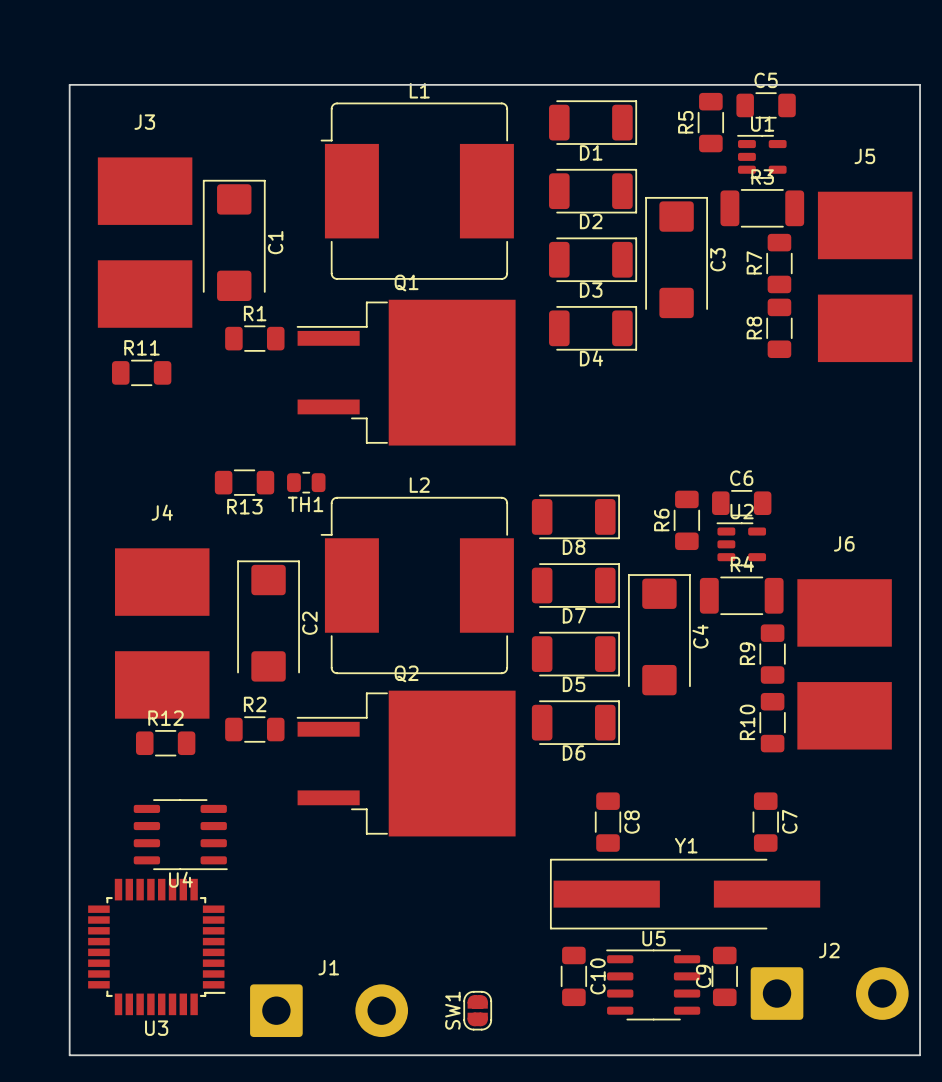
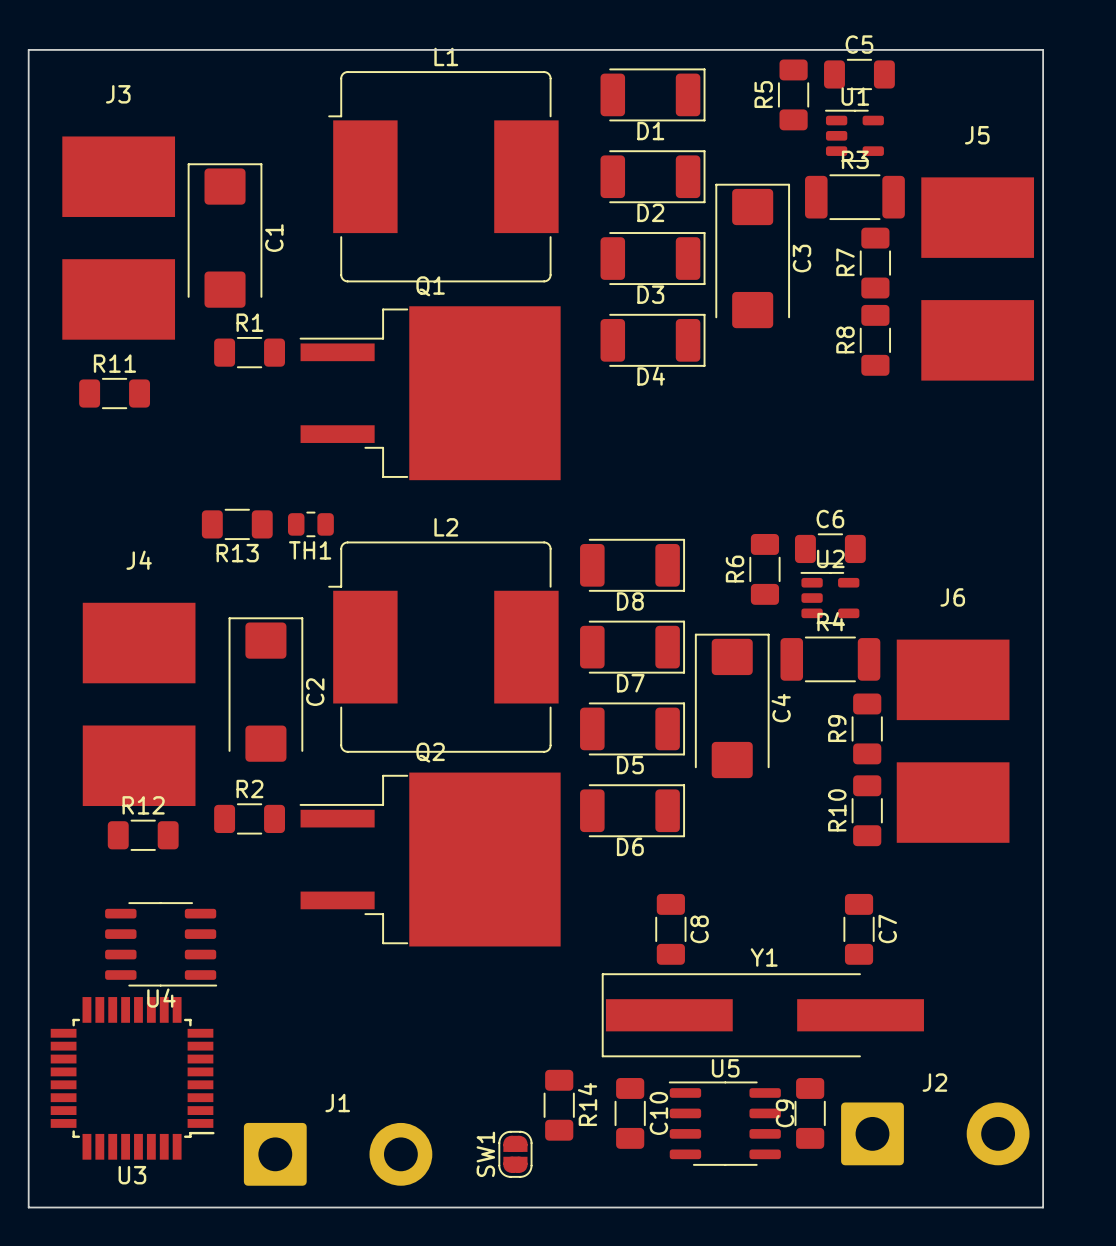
R14: none -> (559, 1105)

